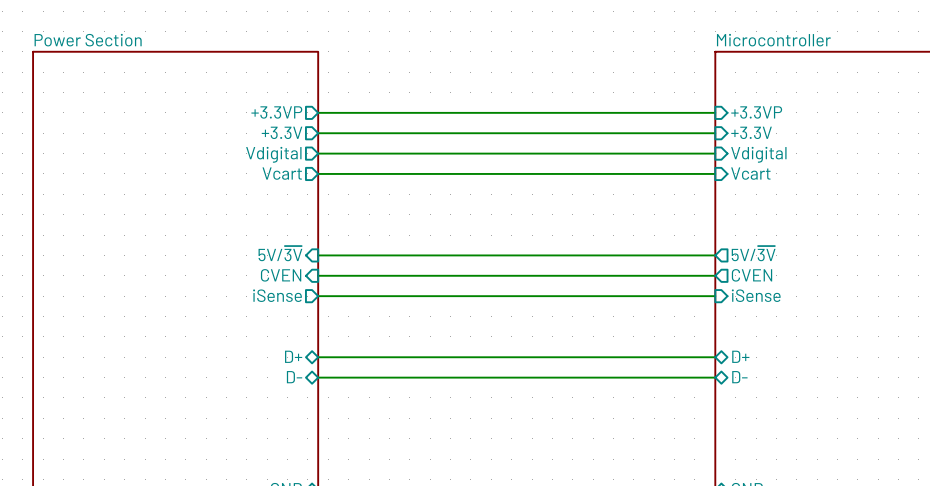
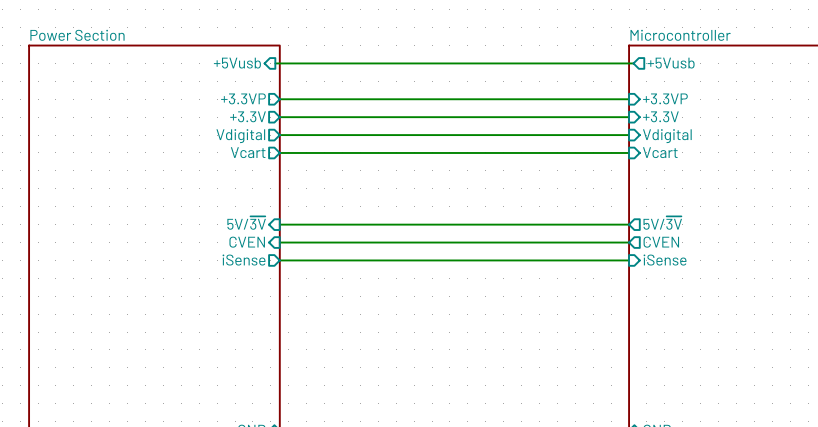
sheet pin: none -> +5Vusb (237, 63)
sheet pin: none -> +5Vusb (671, 63)
wire: none -> (275, 63) (633, 63)
sheet pin: D+ (293, 356) -> none
sheet pin: D+ (740, 356) -> none
wire: (318, 357) (715, 357) -> none
sheet pin: D- (294, 377) -> none
wire: (318, 377) (715, 377) -> none
sheet pin: D- (739, 377) -> none

